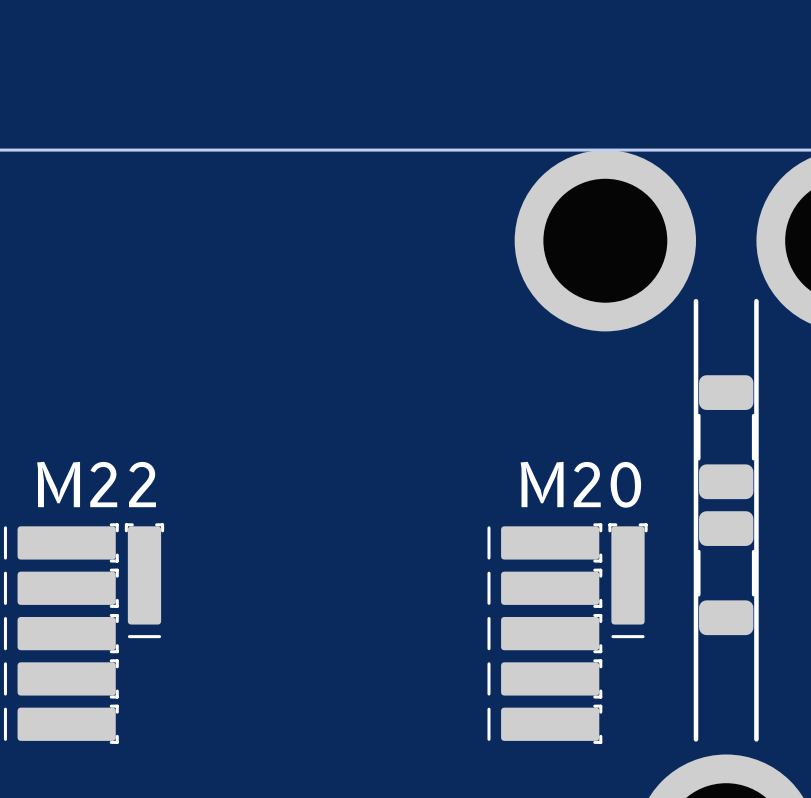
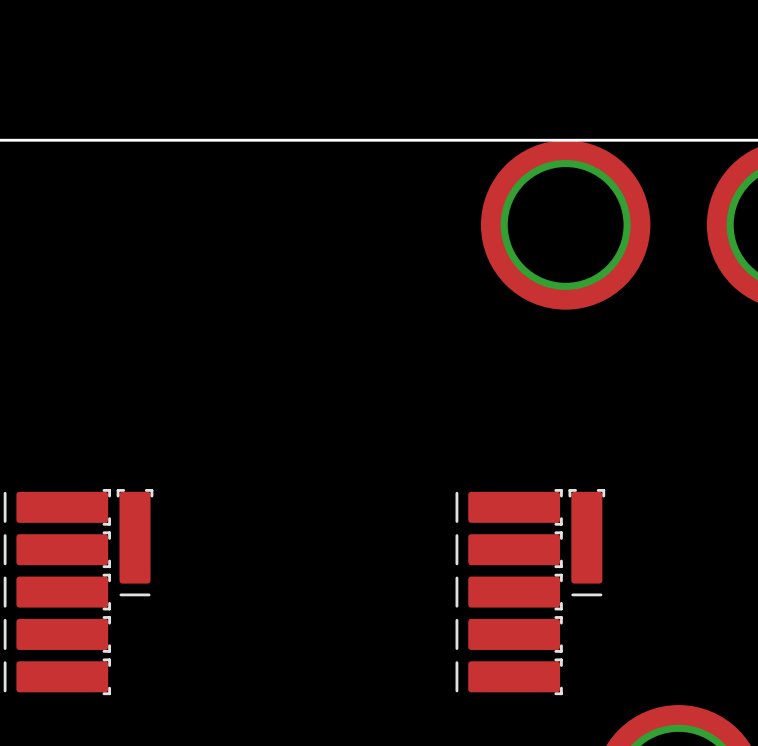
line: (696, 301) (696, 739) -> none
line: (756, 301) (756, 739) -> none
part: (726, 437) -> none
text: M22 (96, 484) -> none
text: M20 (580, 484) -> none
part: (726, 573) -> none

